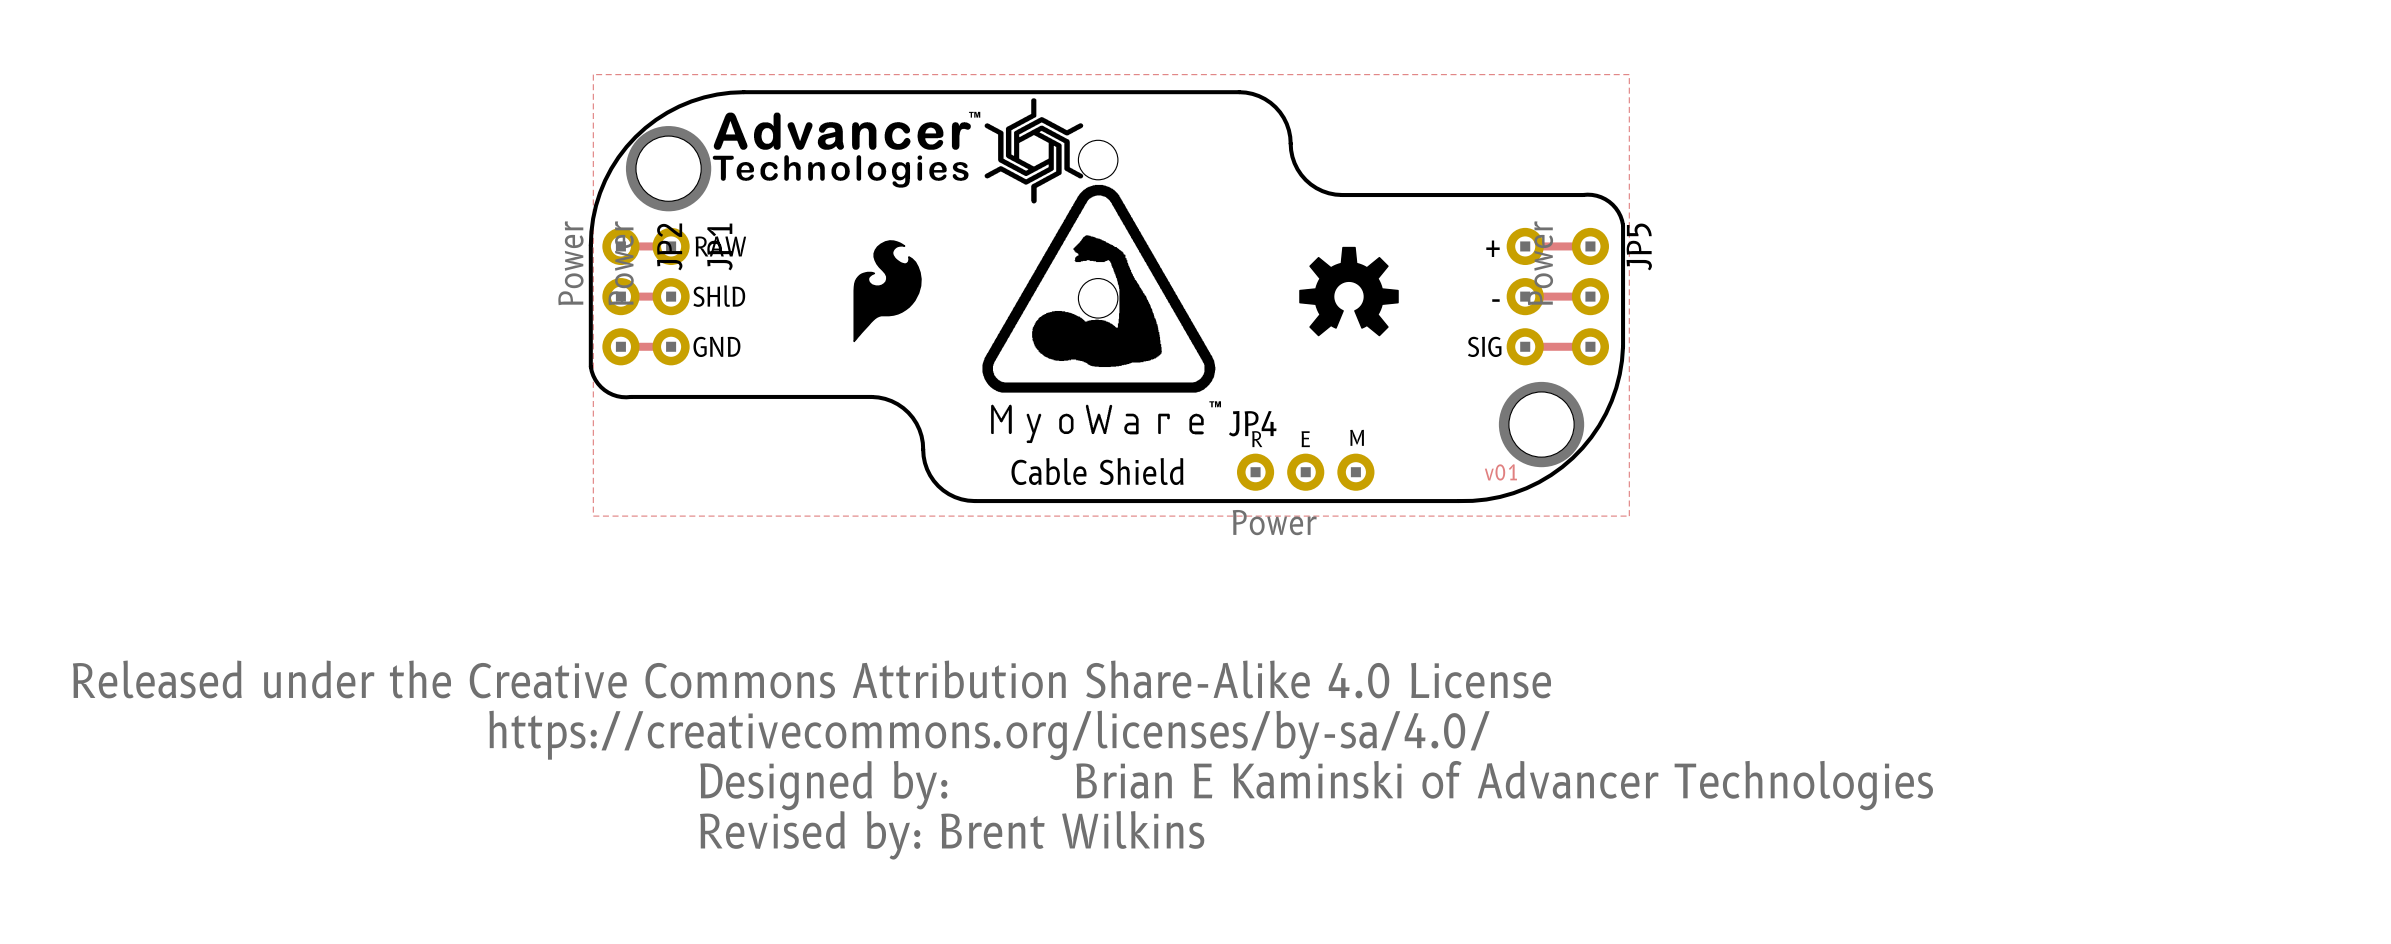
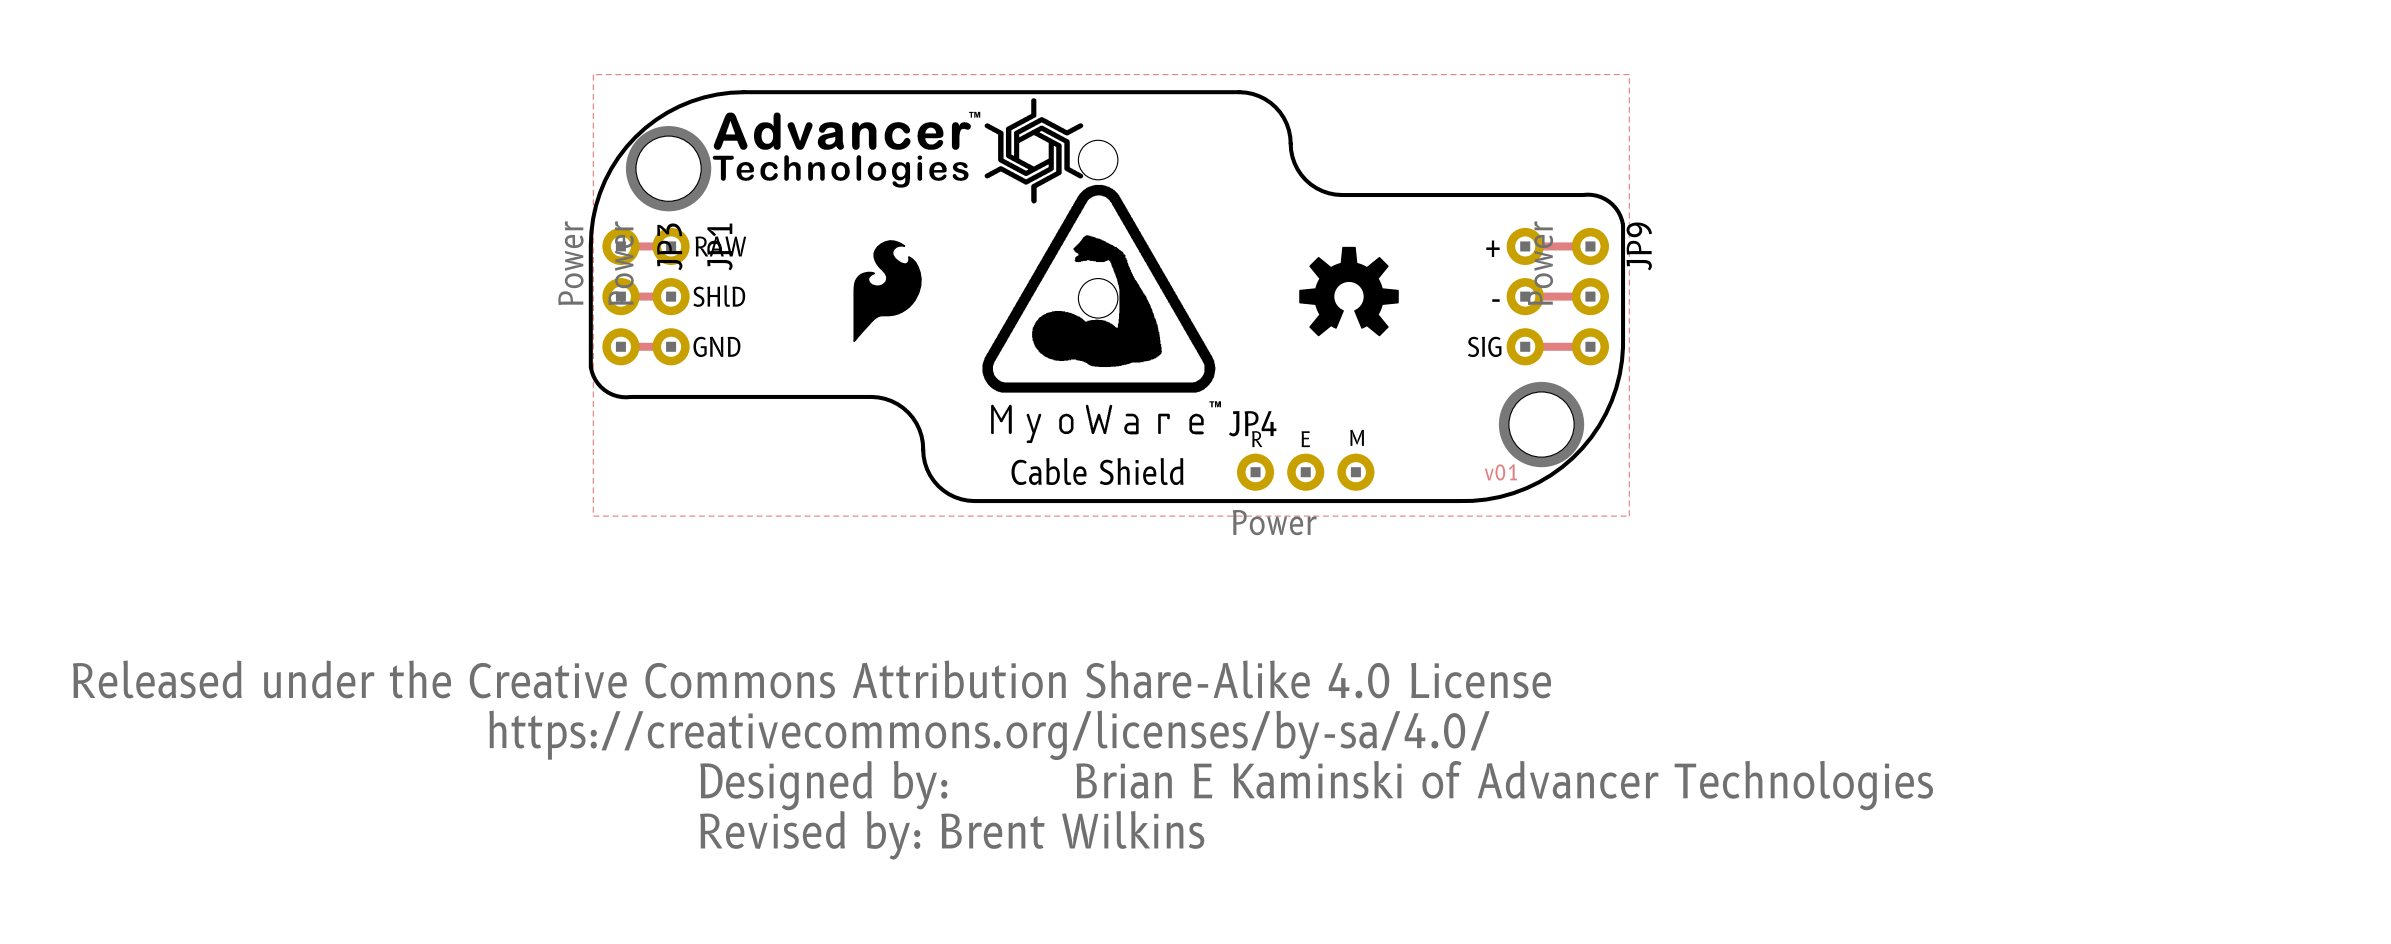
JP2 name: JP2 (669, 246) -> JP3 (669, 246)
JP5 name: JP5 (1639, 246) -> JP9 (1639, 246)

